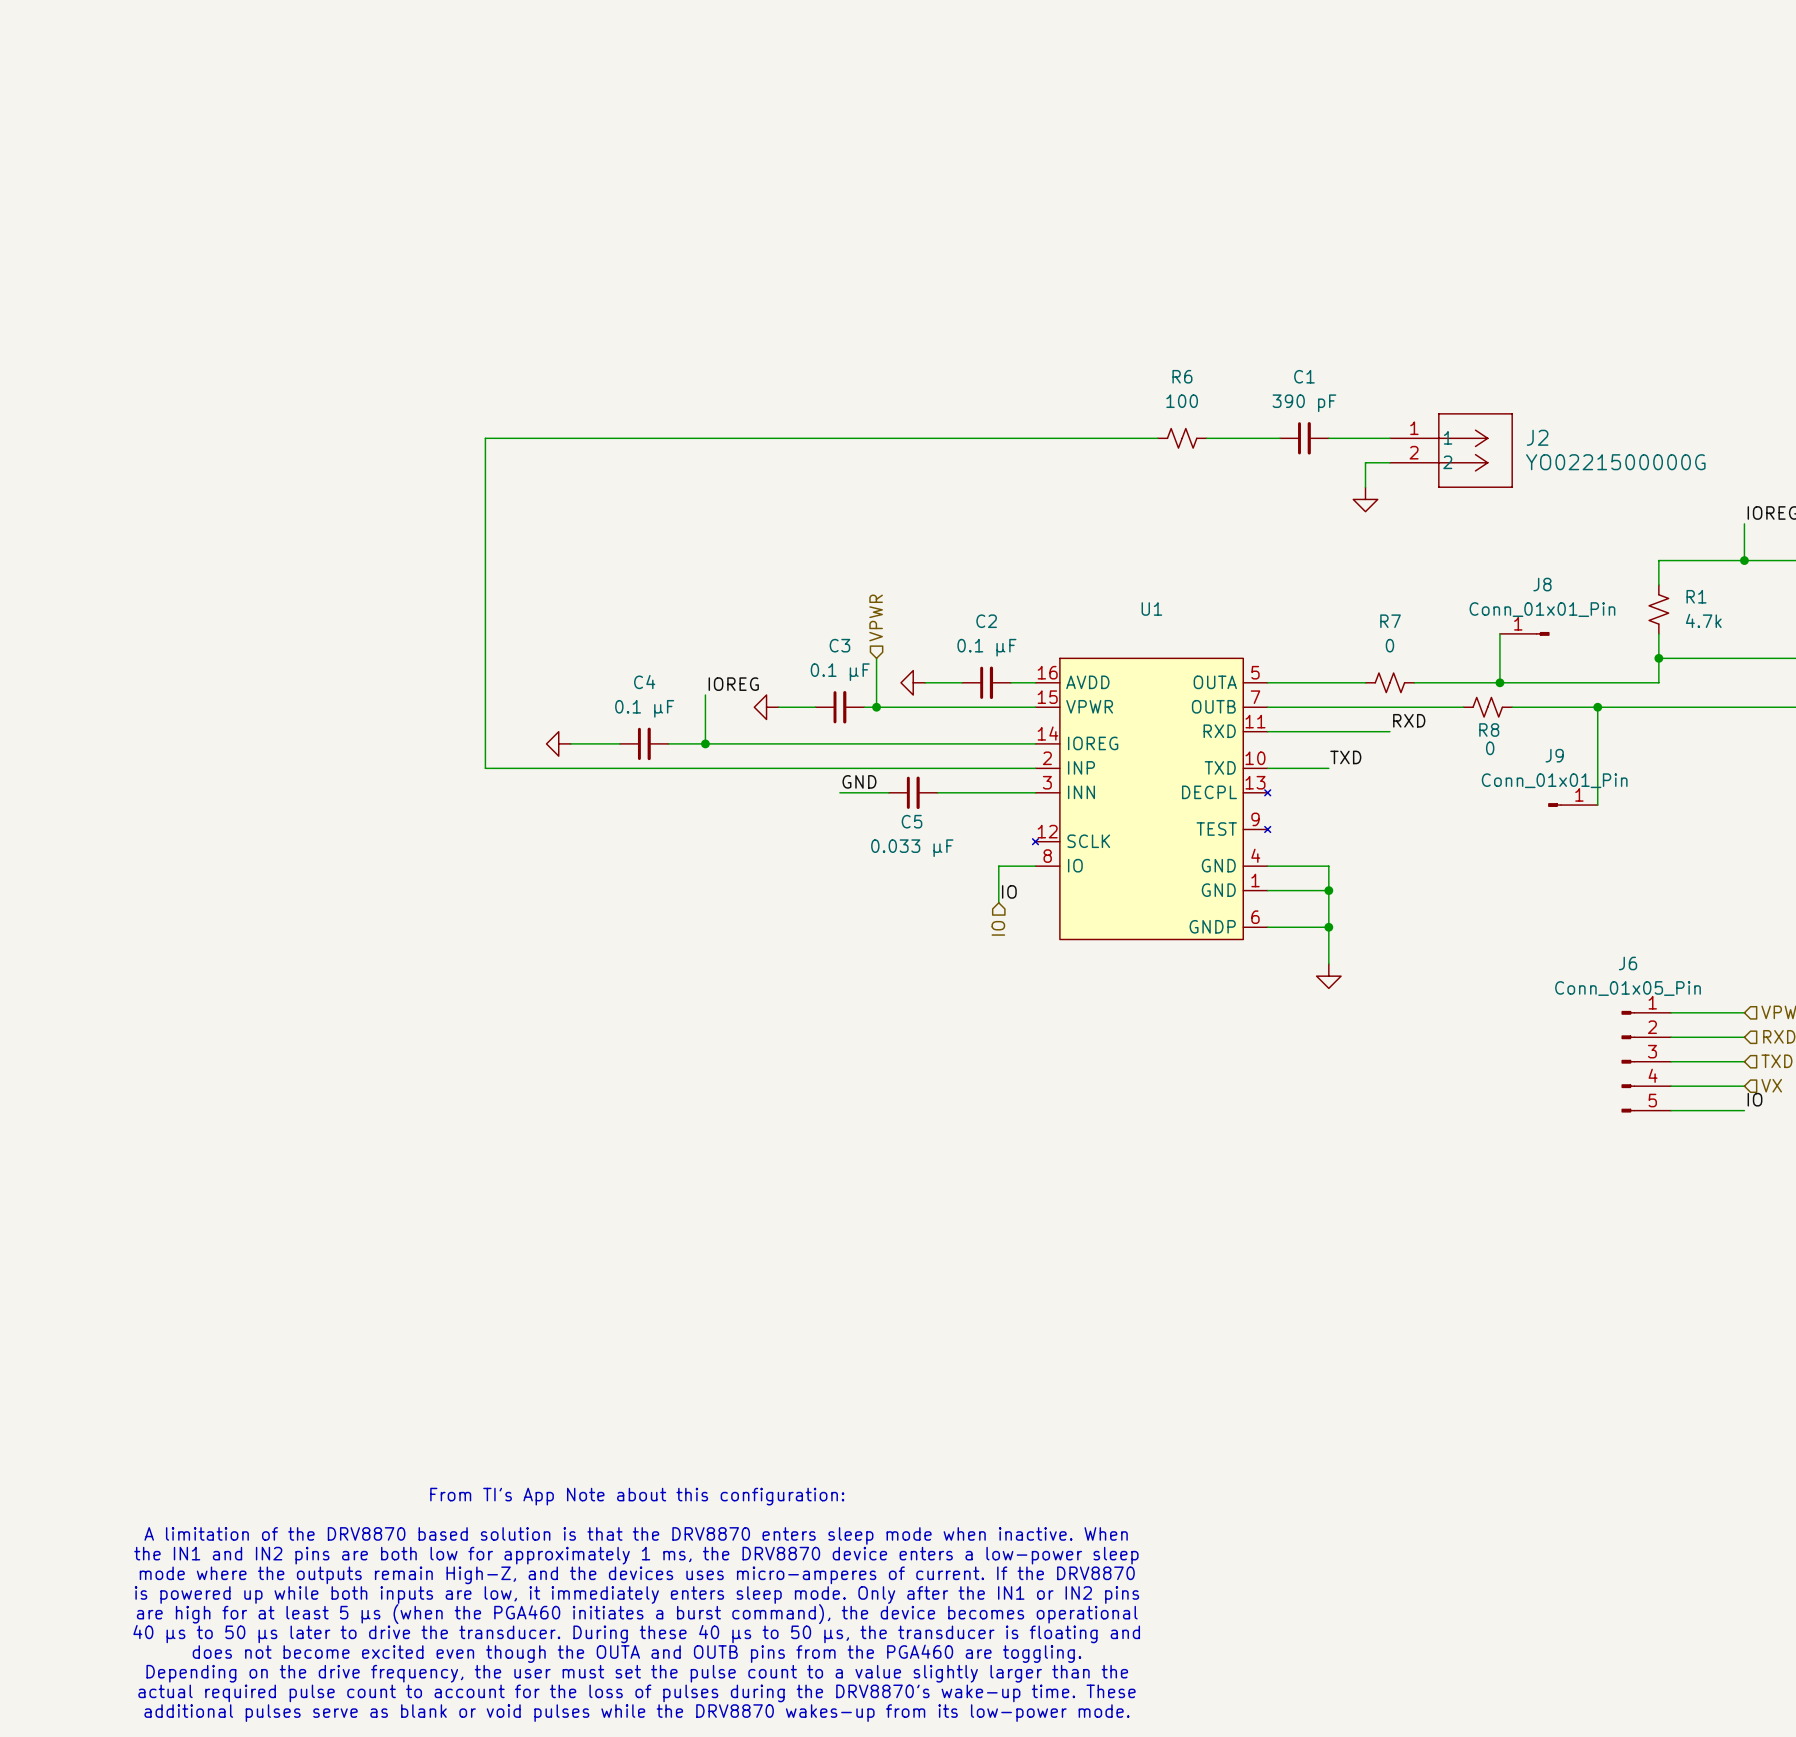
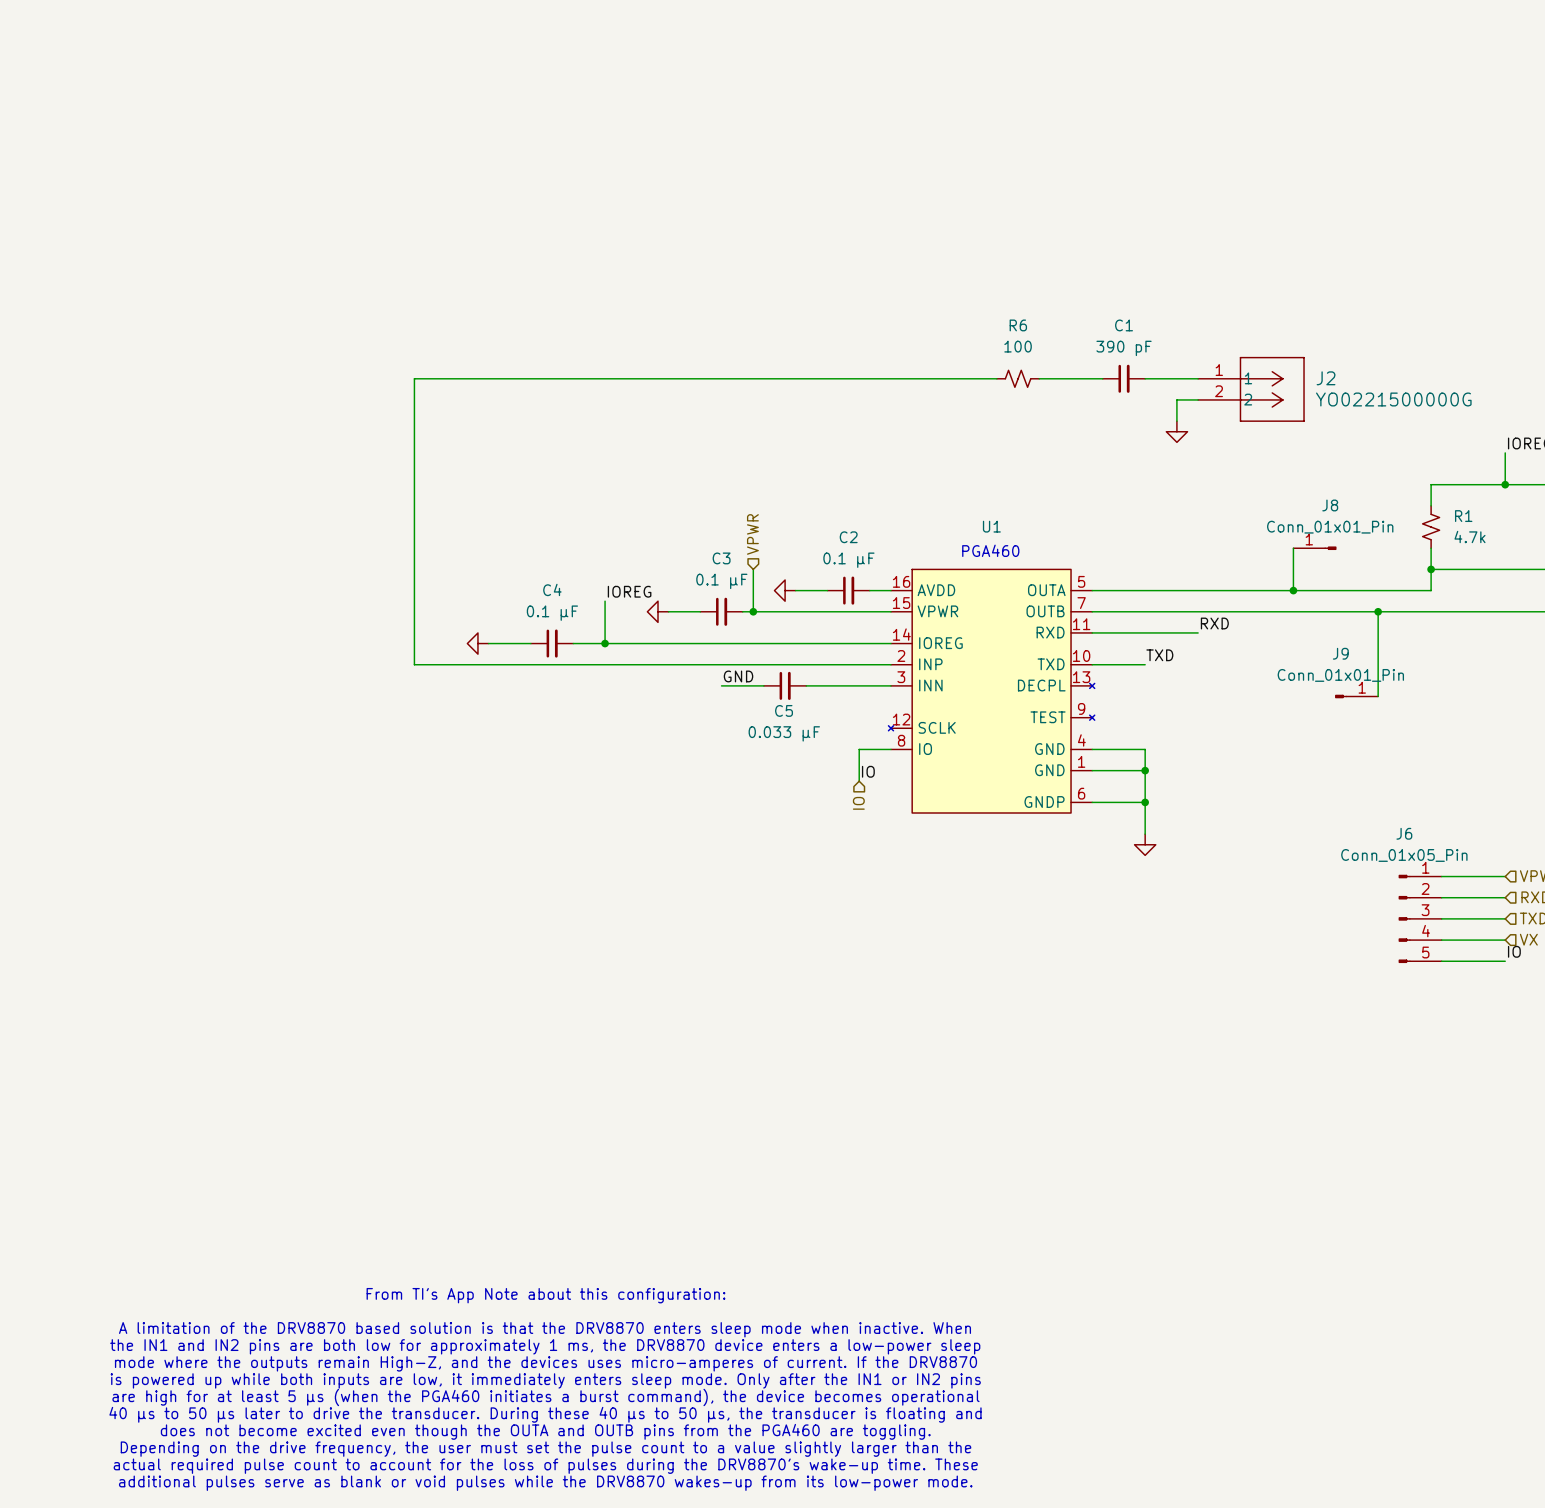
text: none -> PGA460 (990, 550)
R7: 0 (1389, 682) -> none
R8: 0 (1487, 707) -> none

